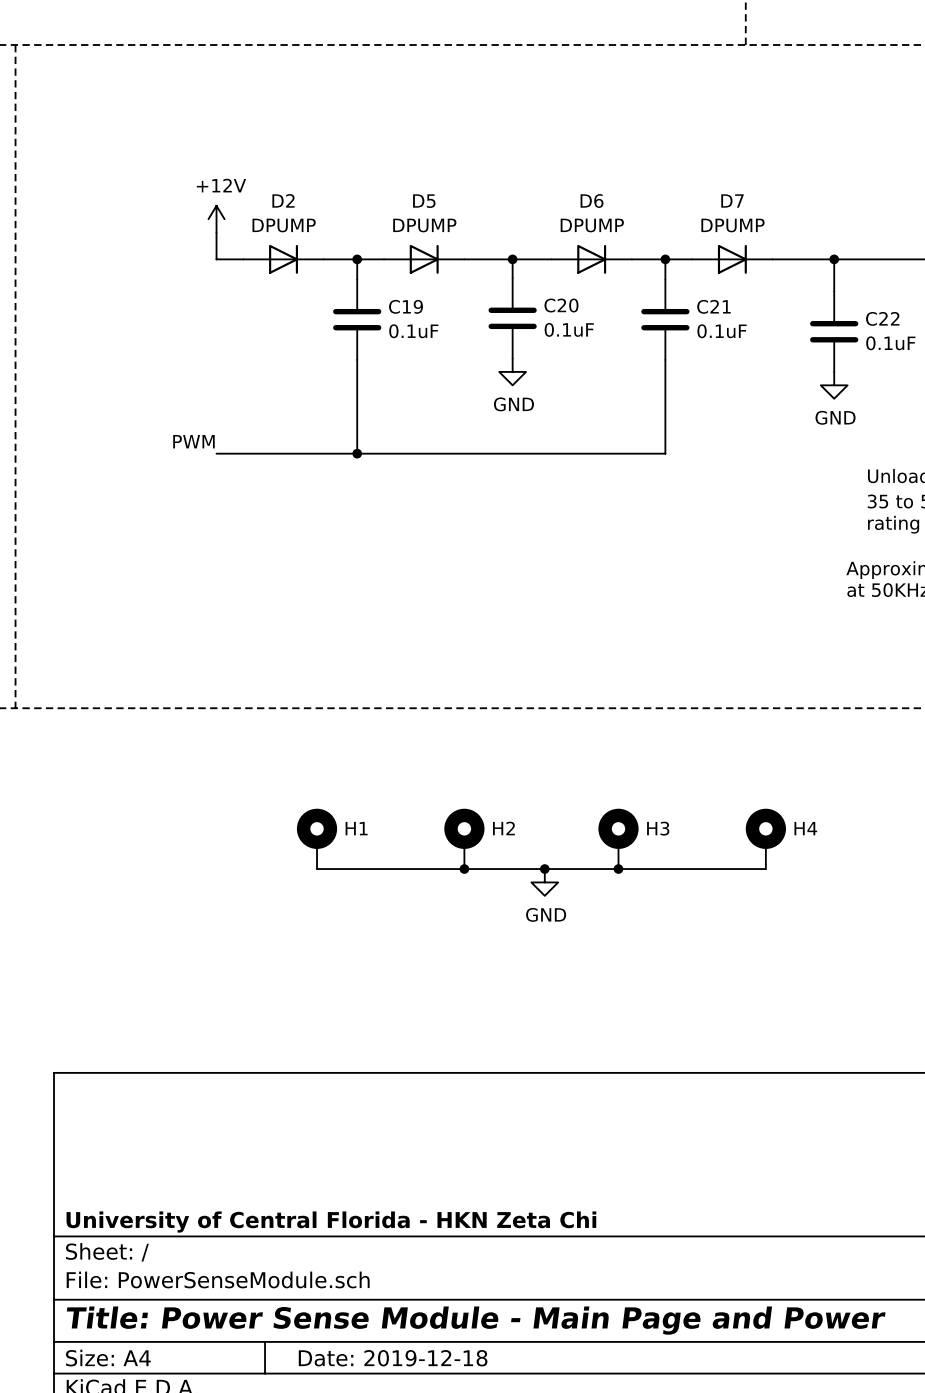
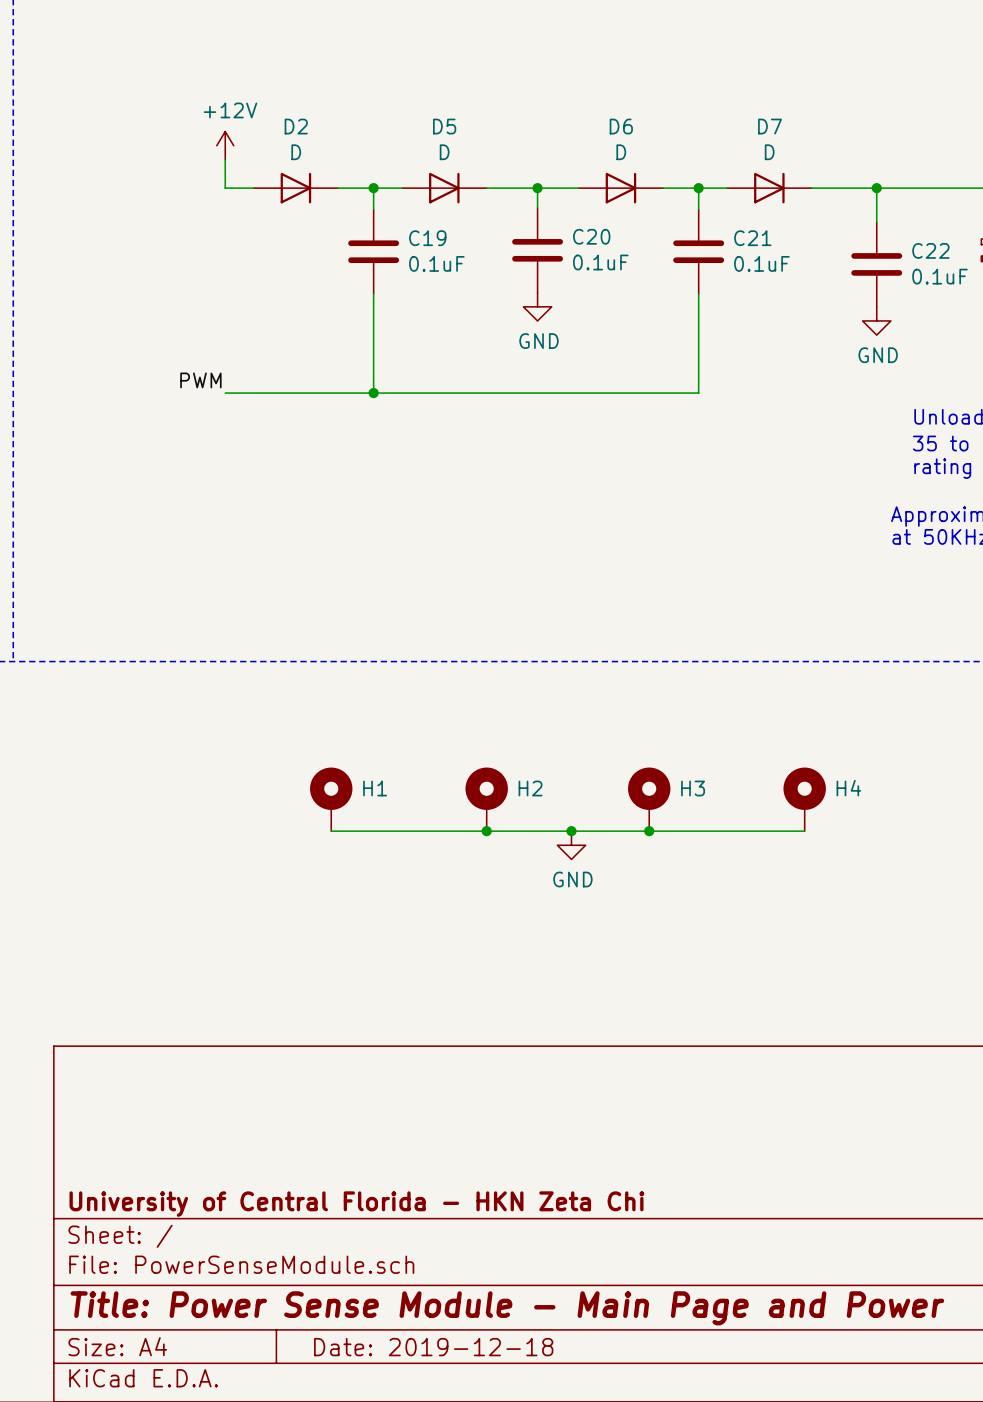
D2 value: DPUMP (284, 225) -> D (296, 152)
D5 value: DPUMP (424, 225) -> D (444, 152)
D6 value: DPUMP (592, 225) -> D (621, 152)
D7 value: DPUMP (732, 225) -> D (769, 152)

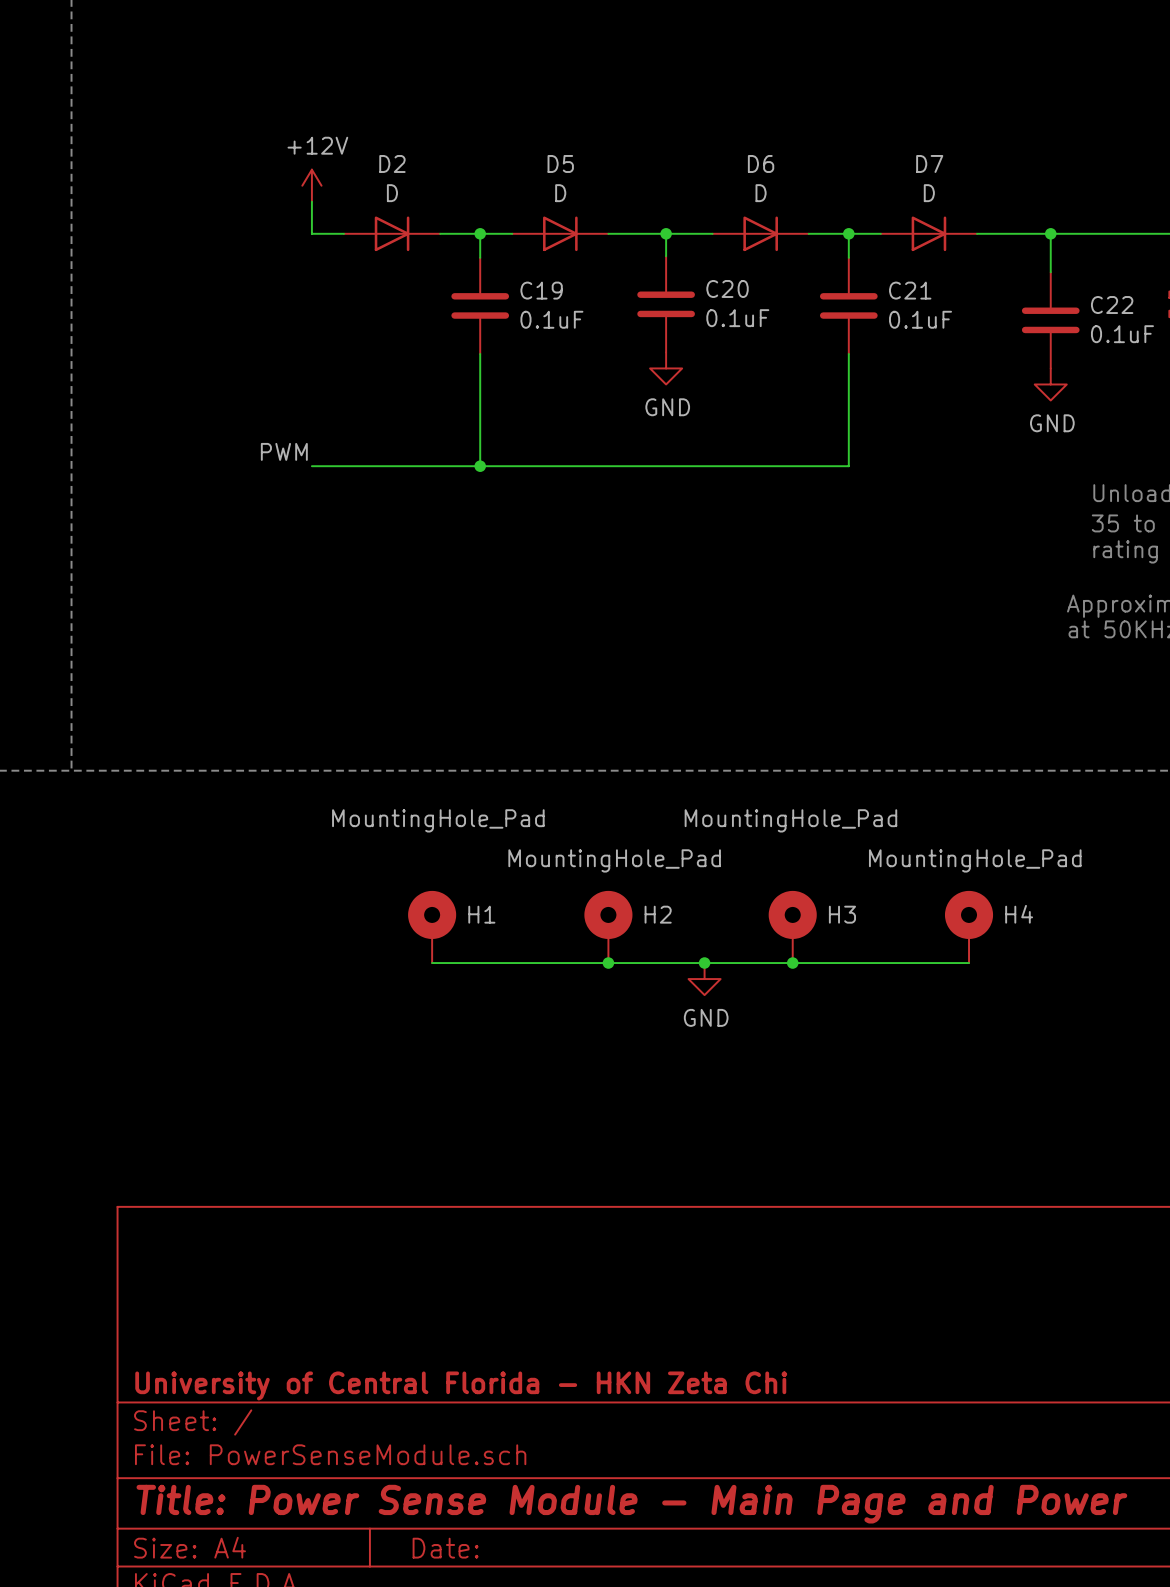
H1 value: none -> MountingHole_Pad (438, 820)
H3 value: none -> MountingHole_Pad (790, 820)
H2 value: none -> MountingHole_Pad (614, 860)
H4 value: none -> MountingHole_Pad (975, 860)
title block: Date: 2019-12-18 (433, 1347) -> Date: (445, 1548)

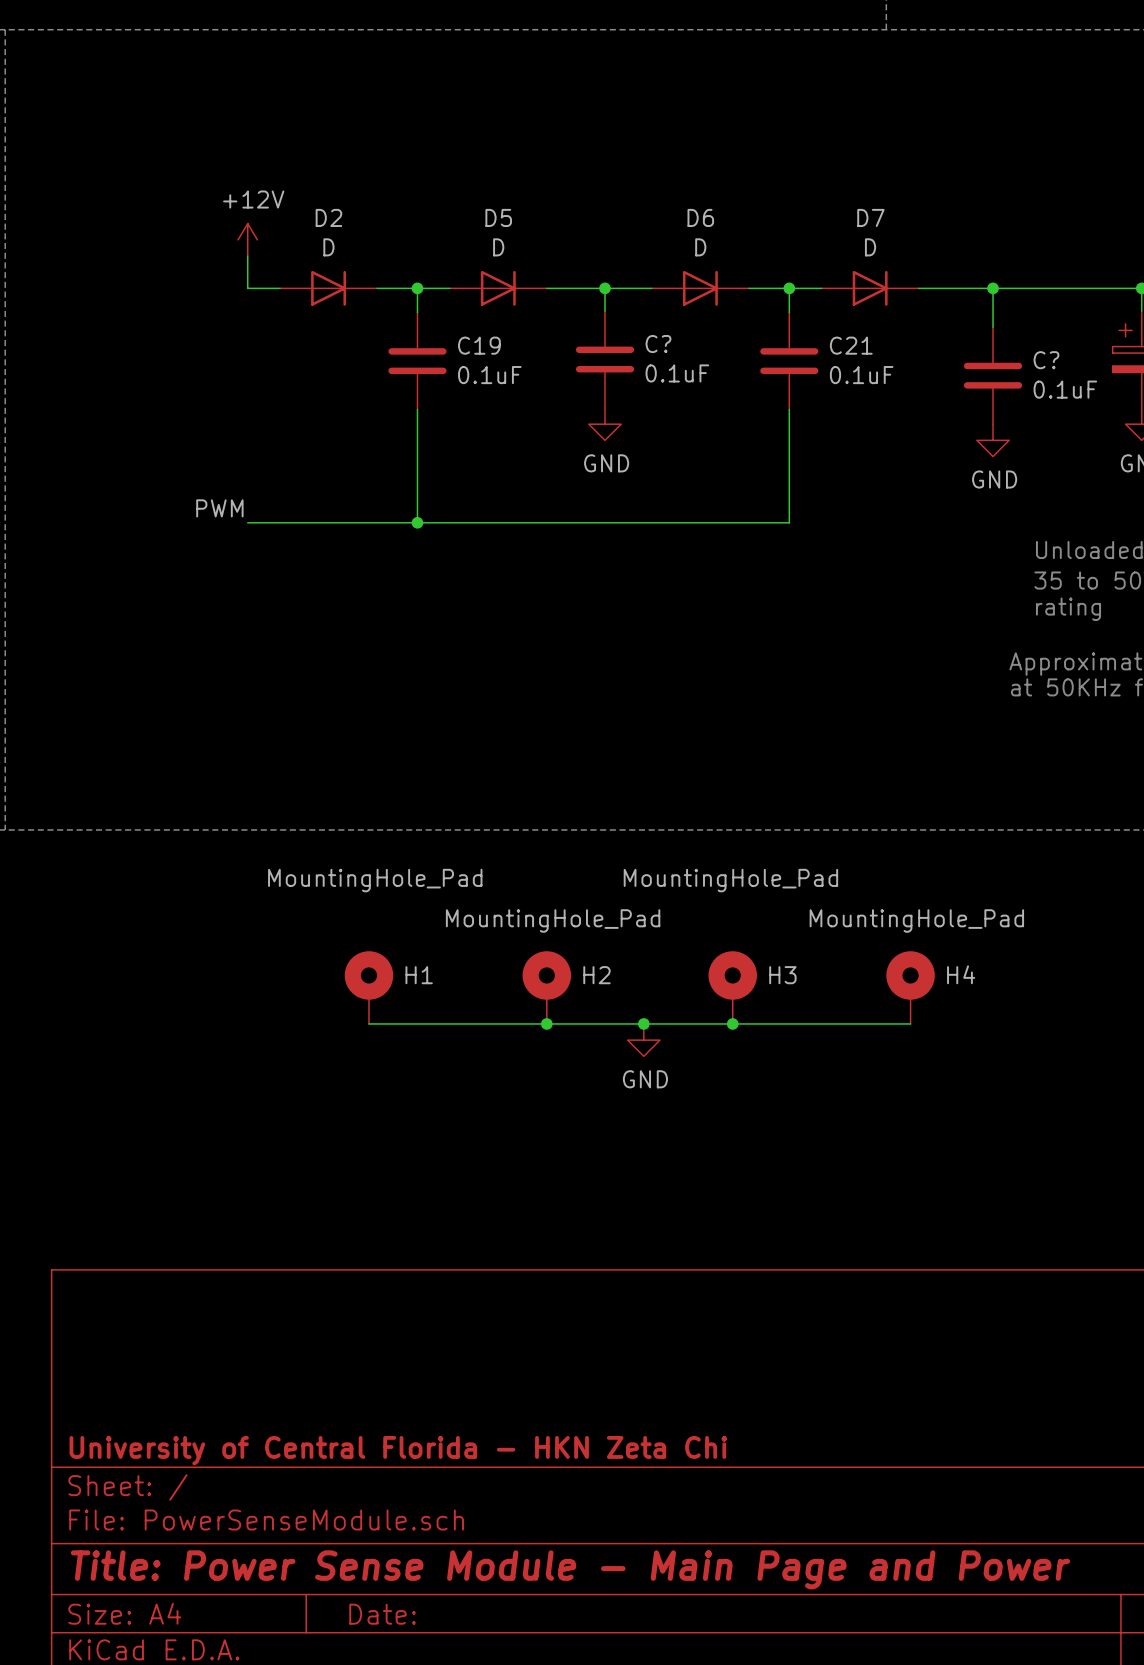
C20 name: C20 (727, 288) -> C? (658, 344)
C22 name: C22 (1112, 305) -> C? (1046, 360)

